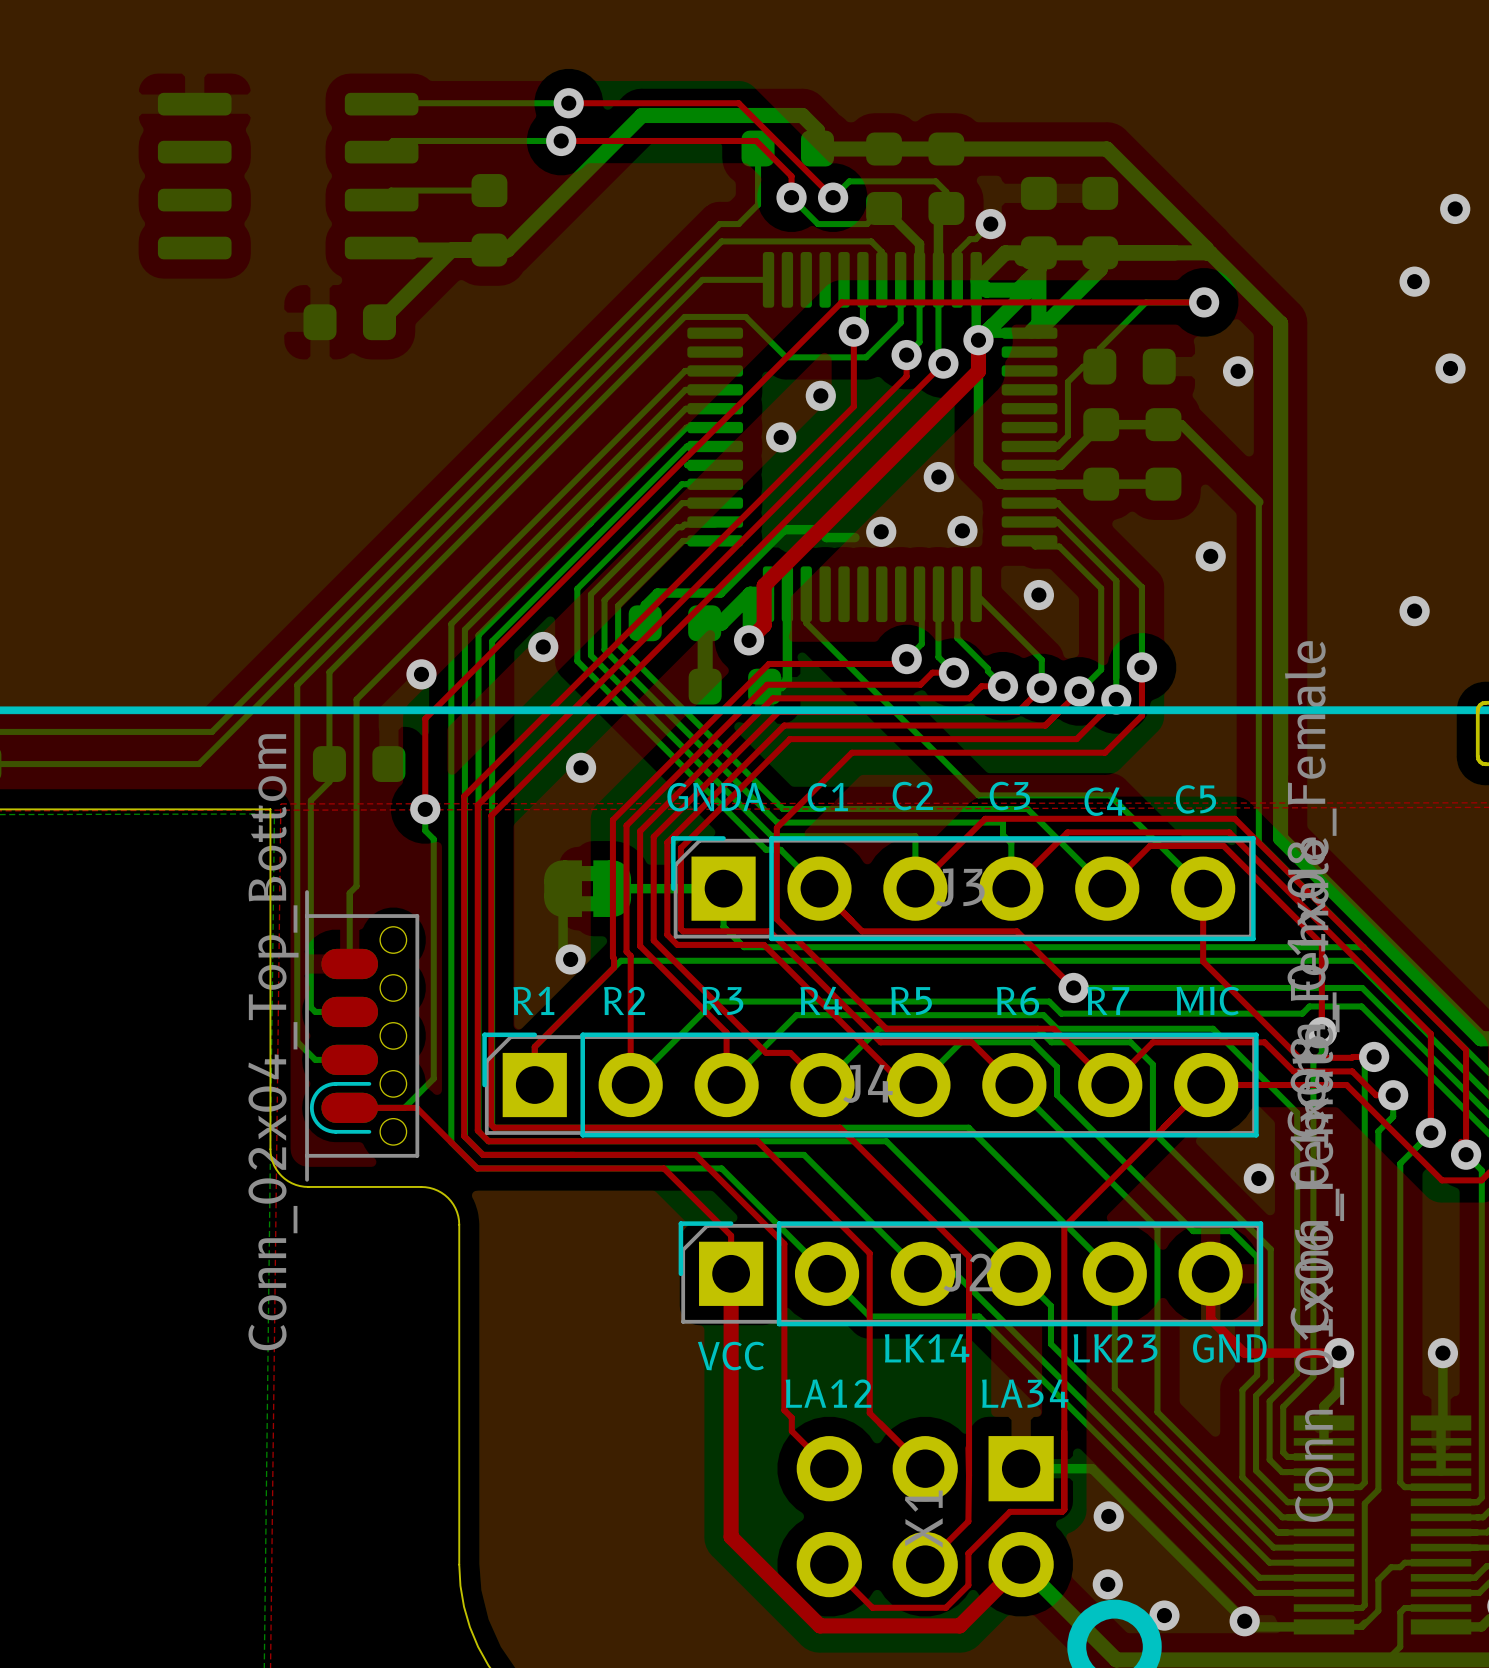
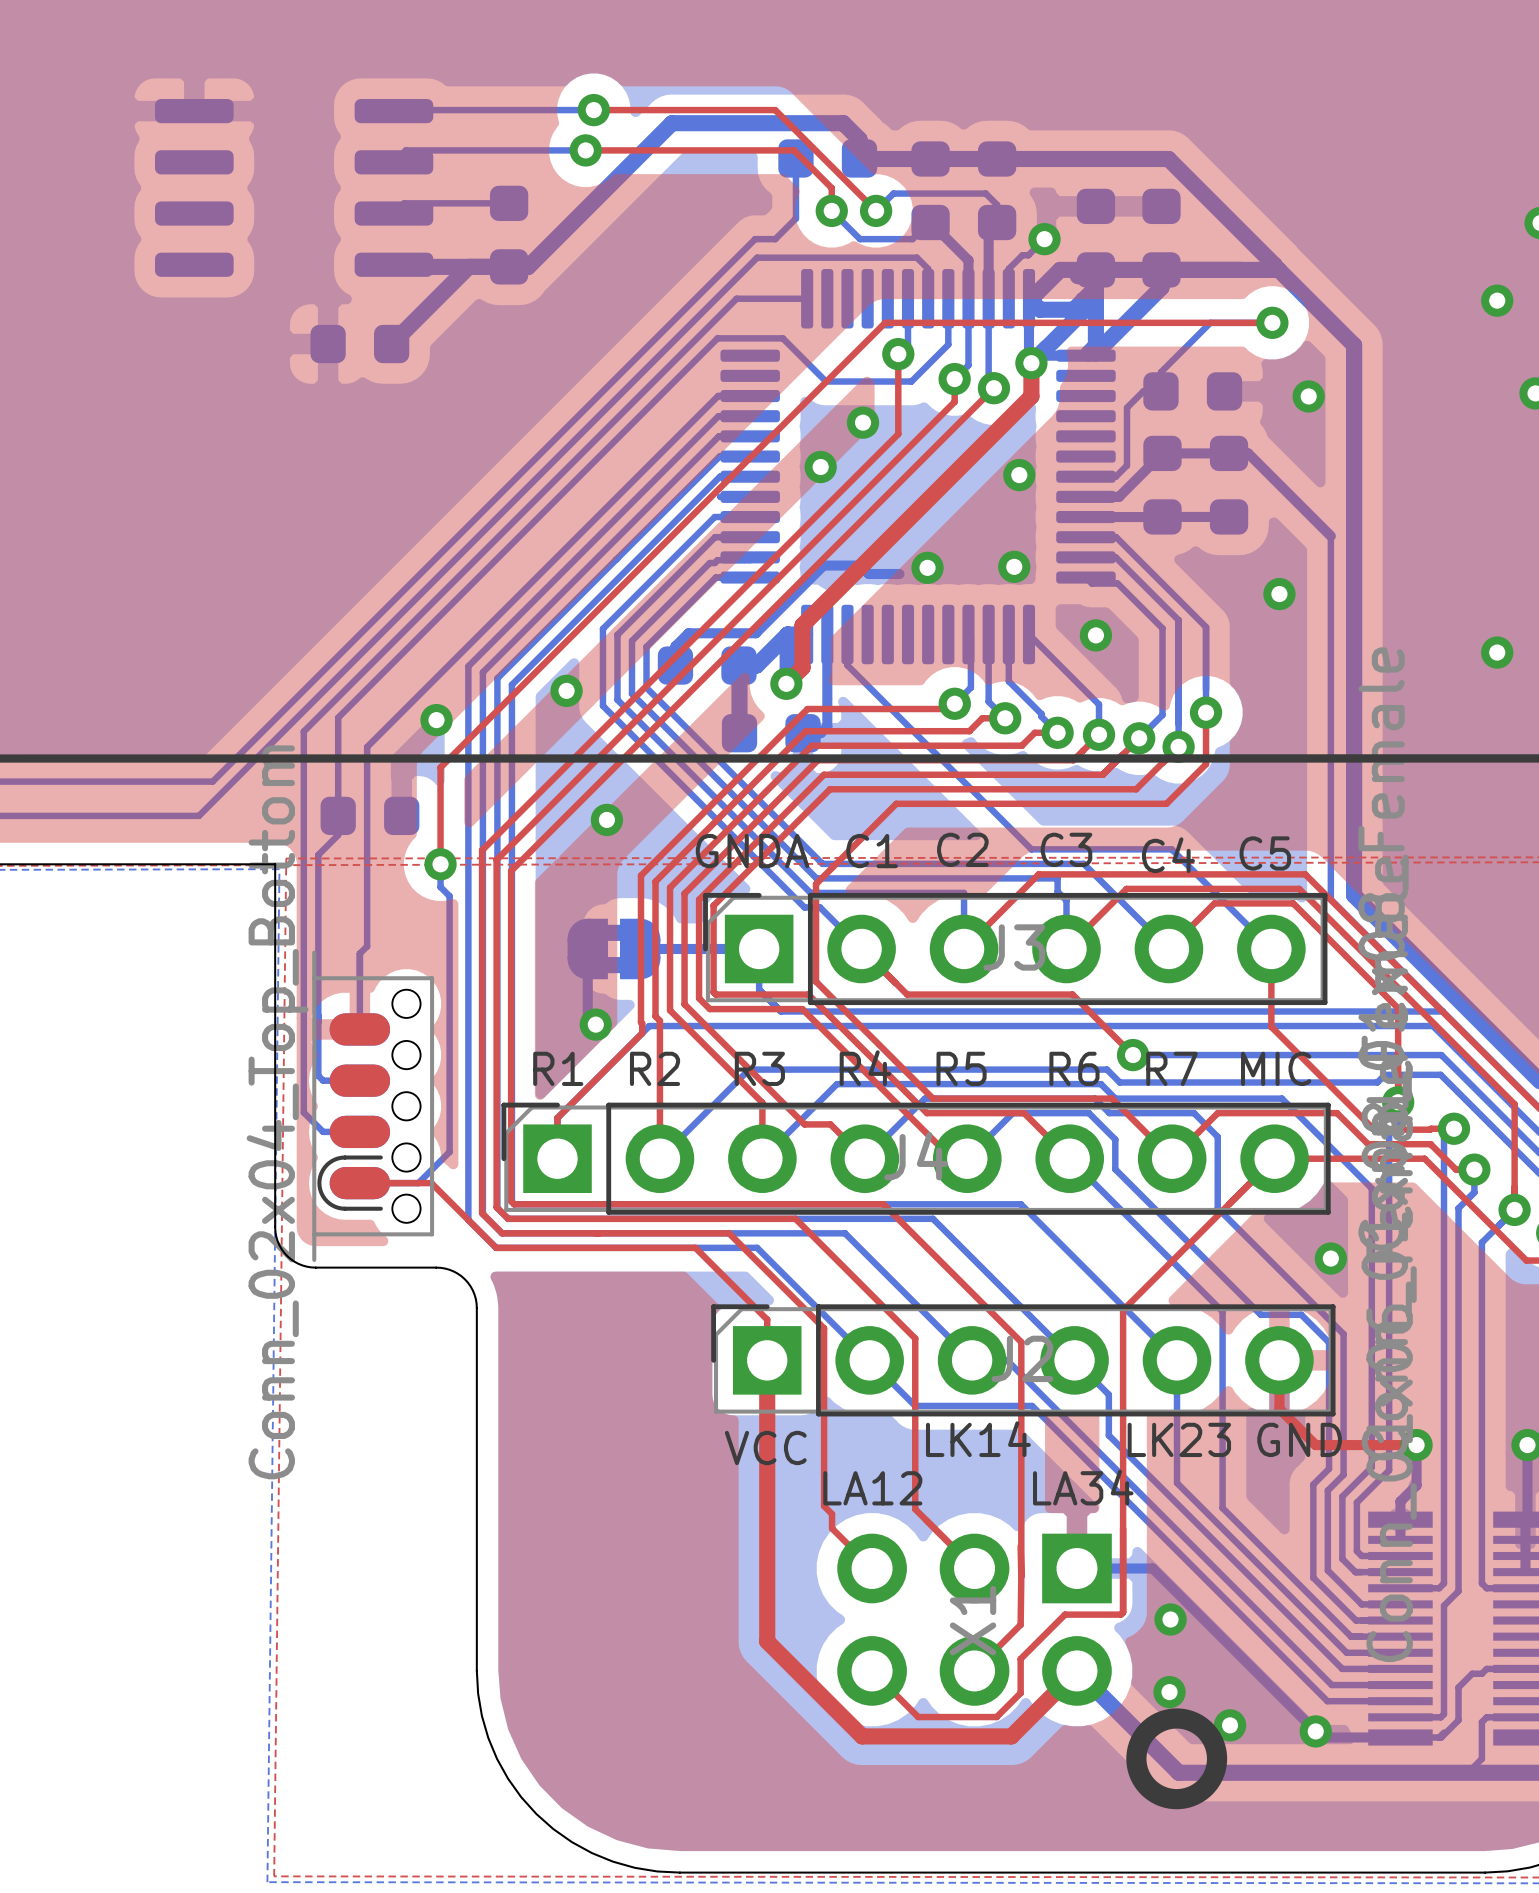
bottom track: (978, 340) (978, 463) (999, 484) (1029, 484) -> none
via position: (938, 477) -> (1019, 475)

